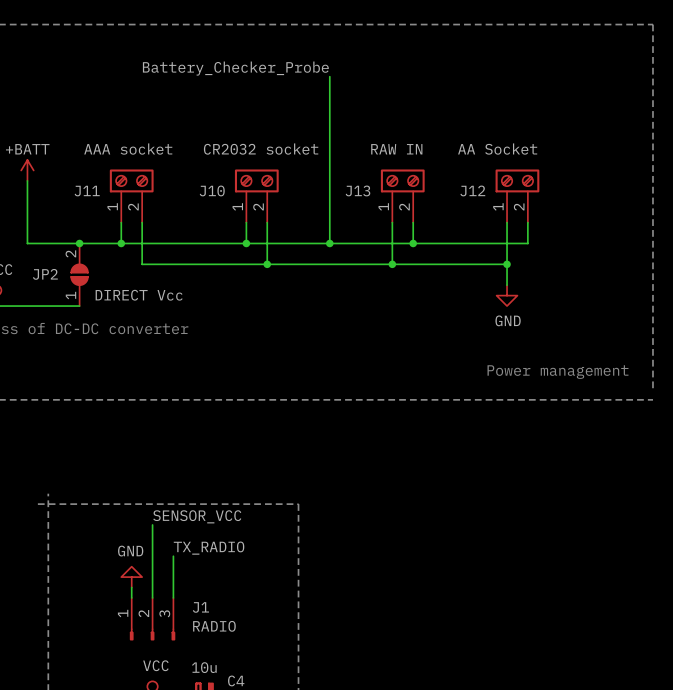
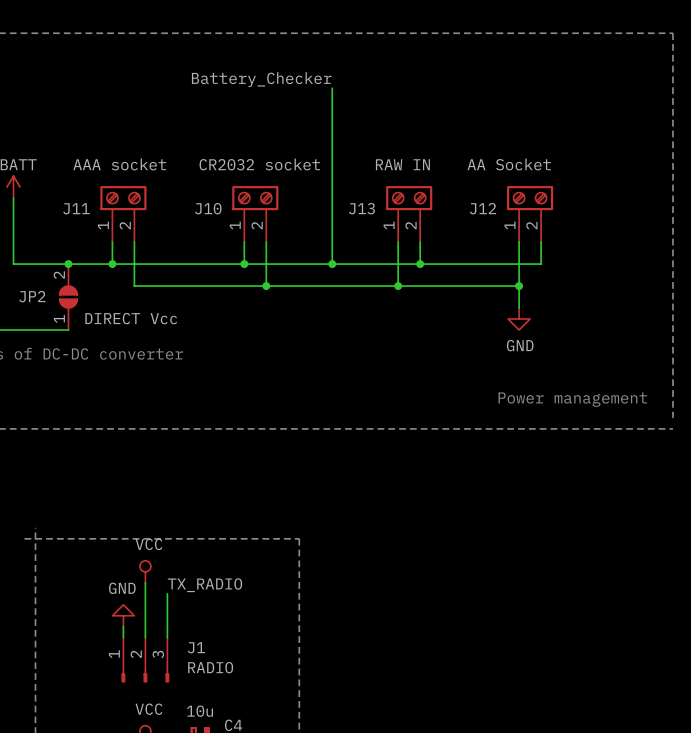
label: Battery_Checker_Probe (235, 68) -> Battery_Checker (261, 79)
label: SENSOR_VCC (197, 516) -> none
power symbol: none -> VCC (145, 571)

